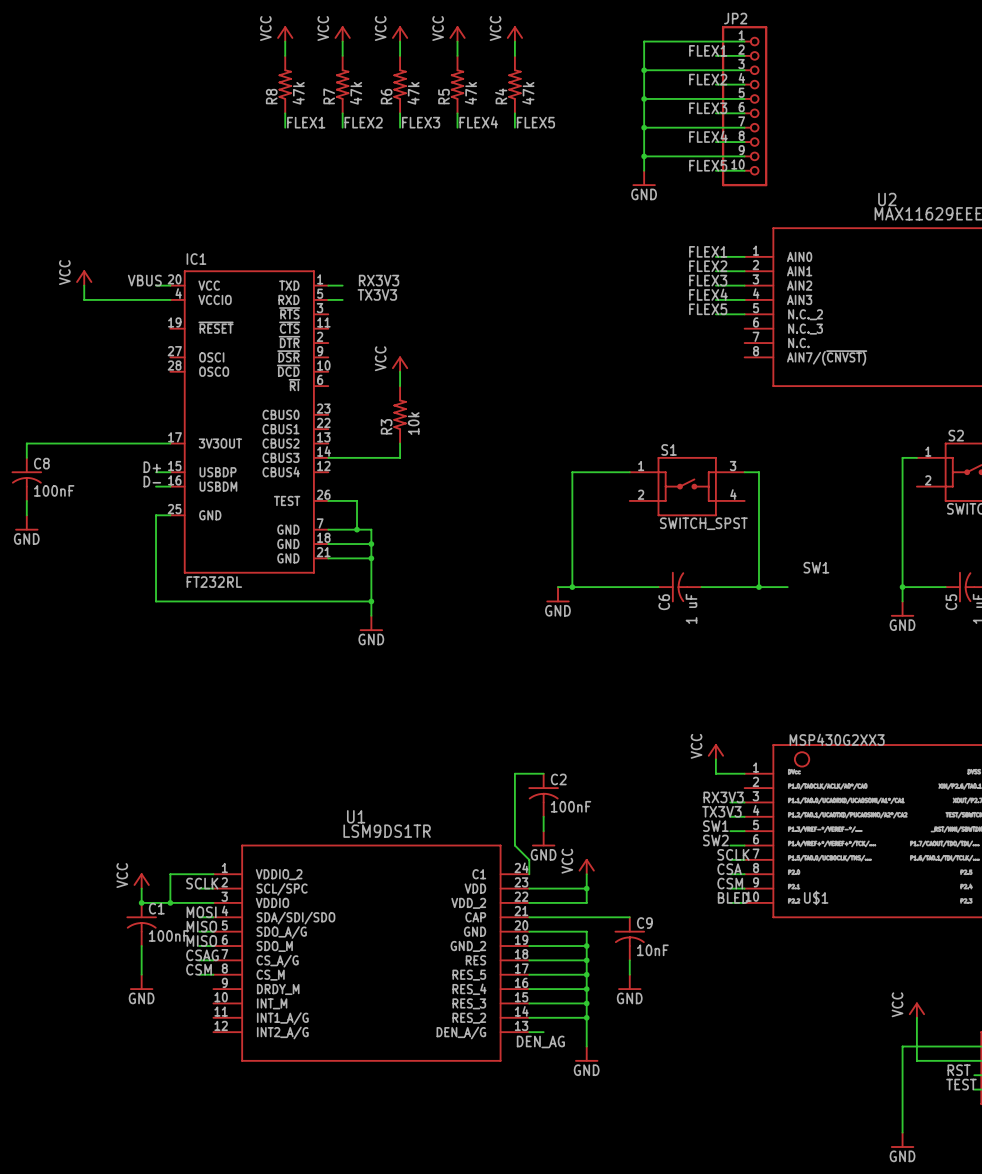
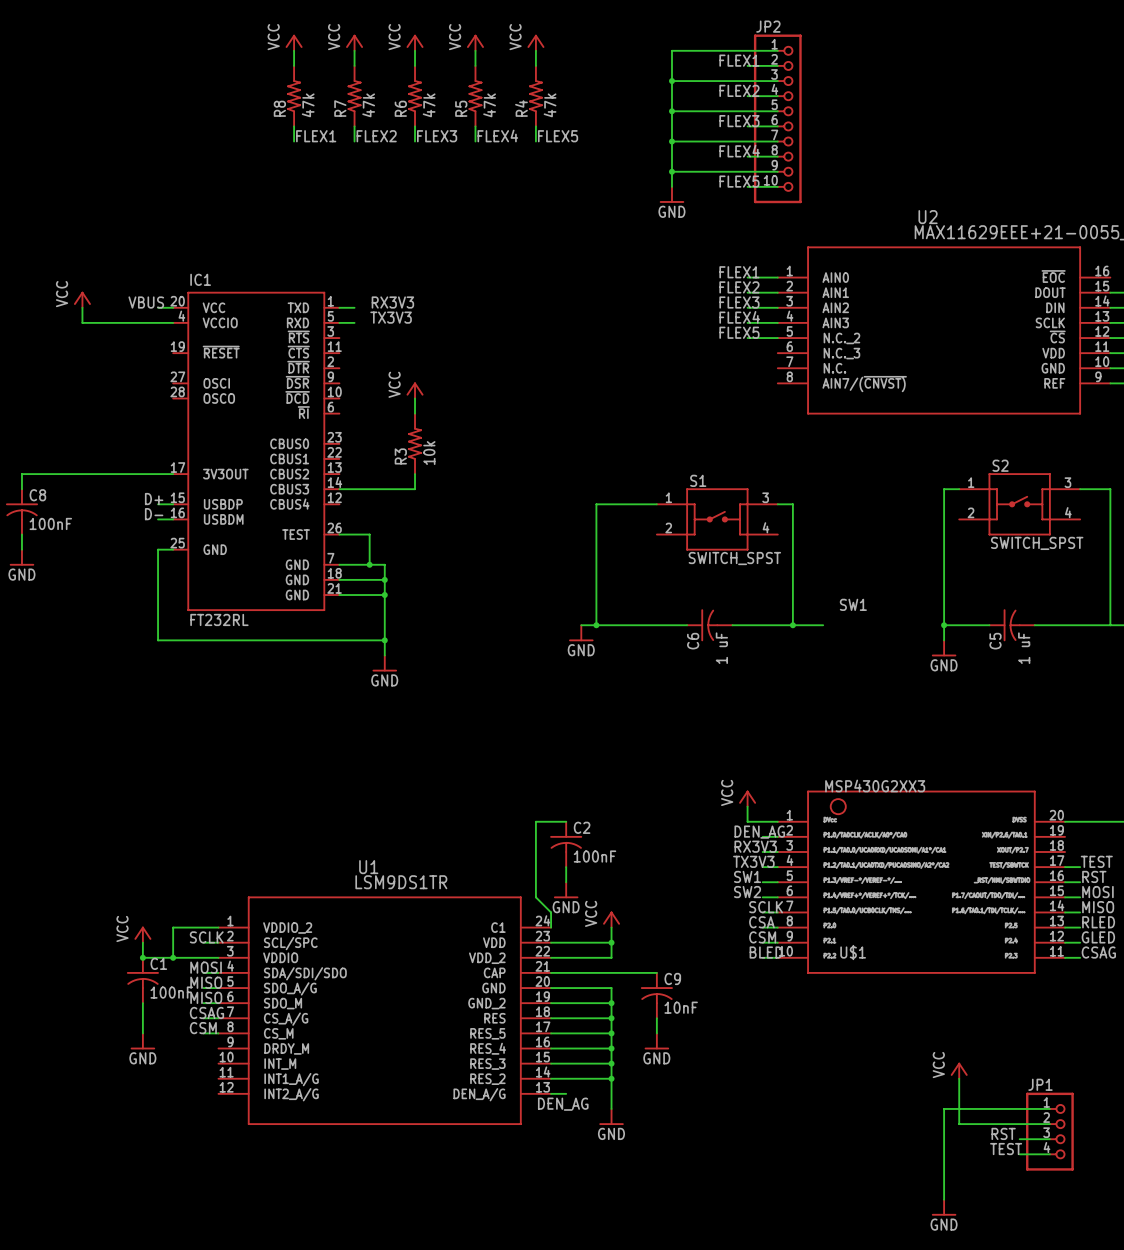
label: none -> DEN_AG (759, 832)
wire: none -> (762, 836) (777, 836)

